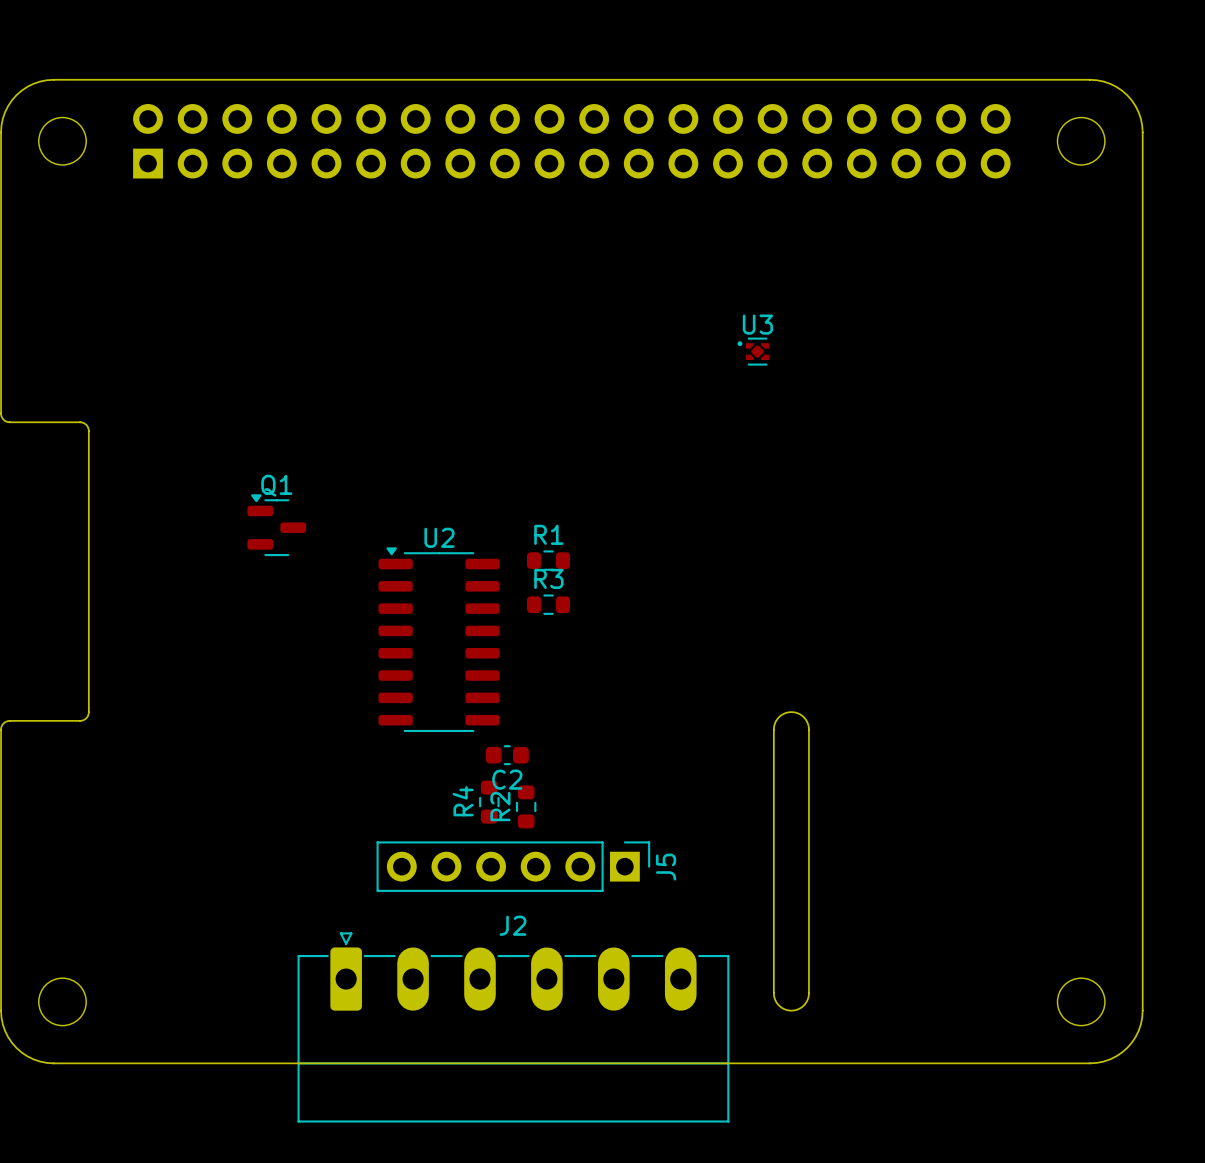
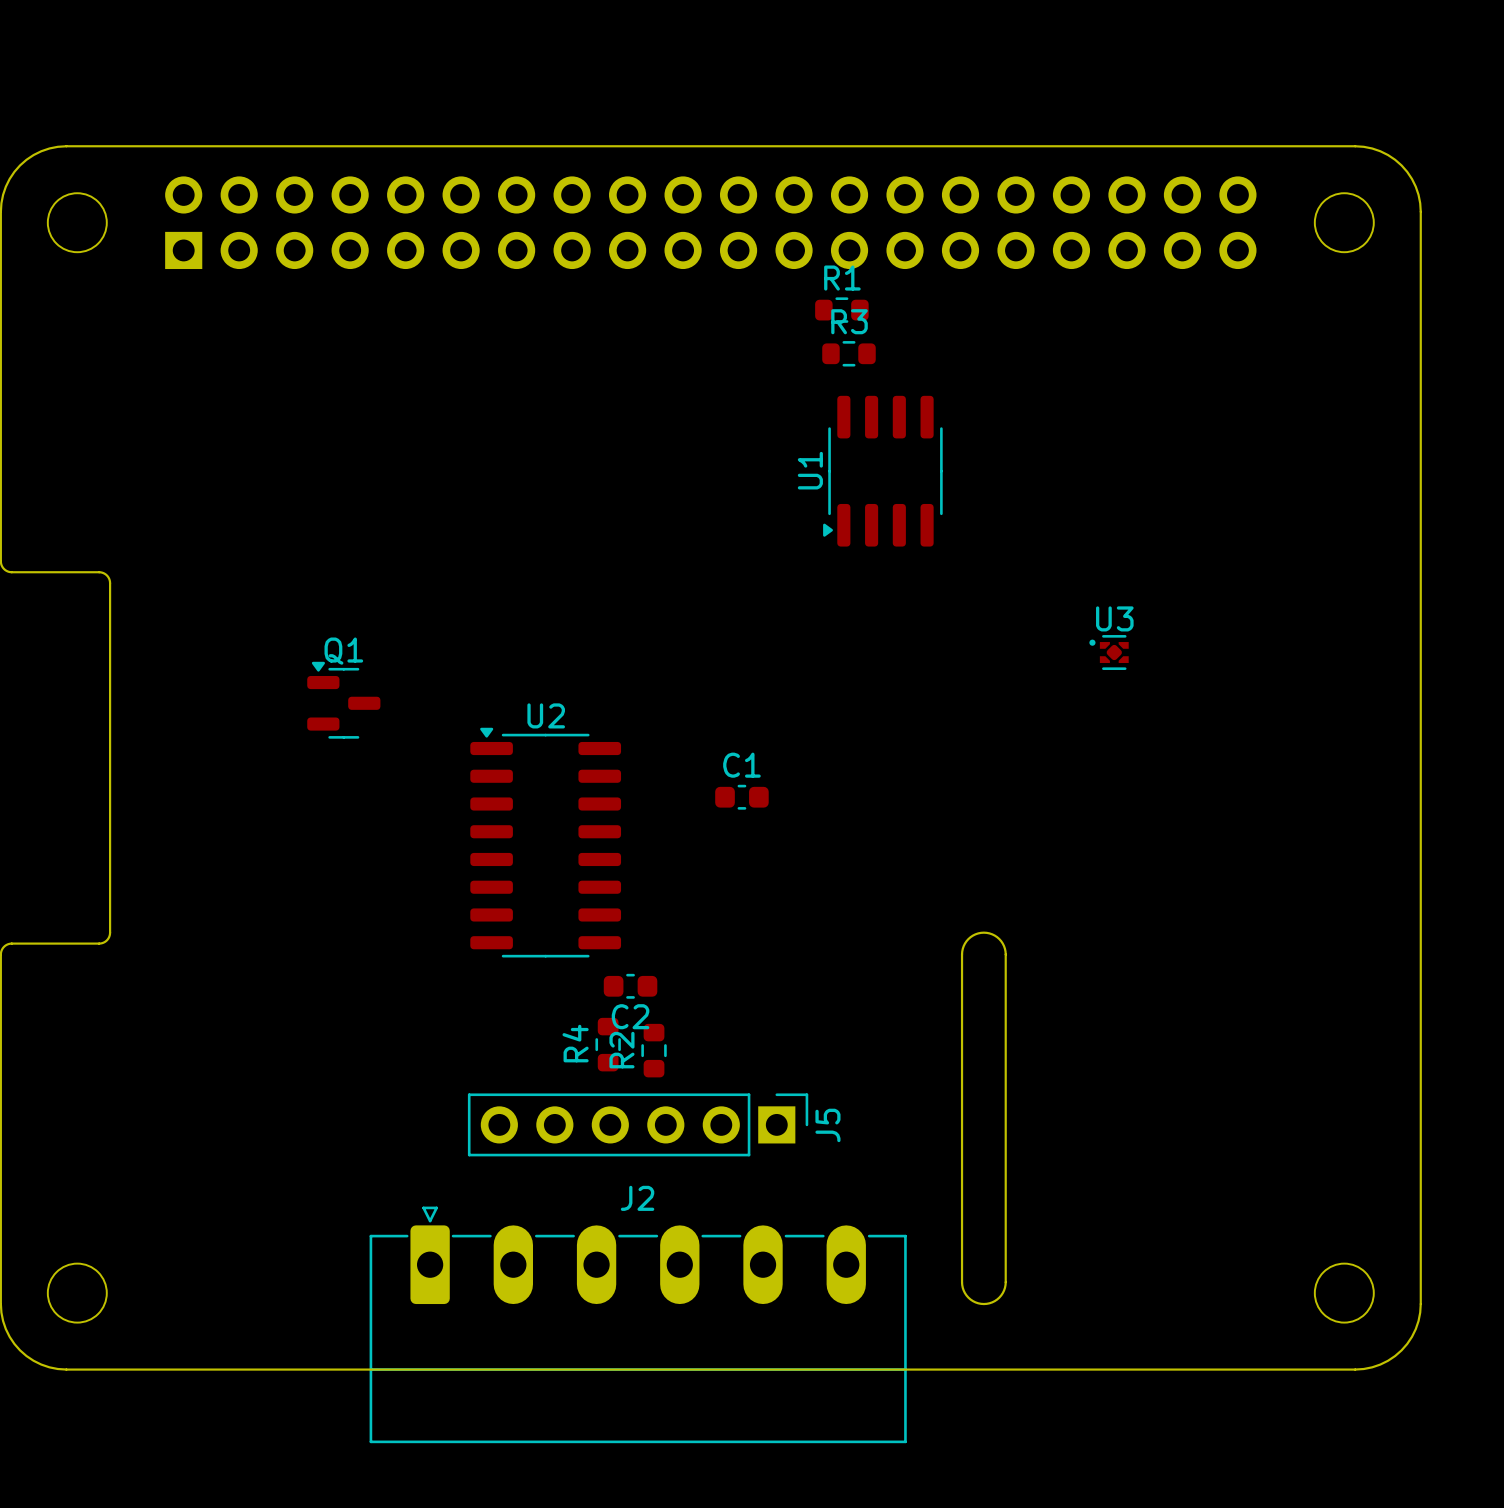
U1: none -> (882, 471)
U3 position: (753, 351) -> (1109, 652)
R1 position: (548, 560) -> (841, 310)
C1: none -> (741, 797)
R3 position: (548, 604) -> (848, 353)

